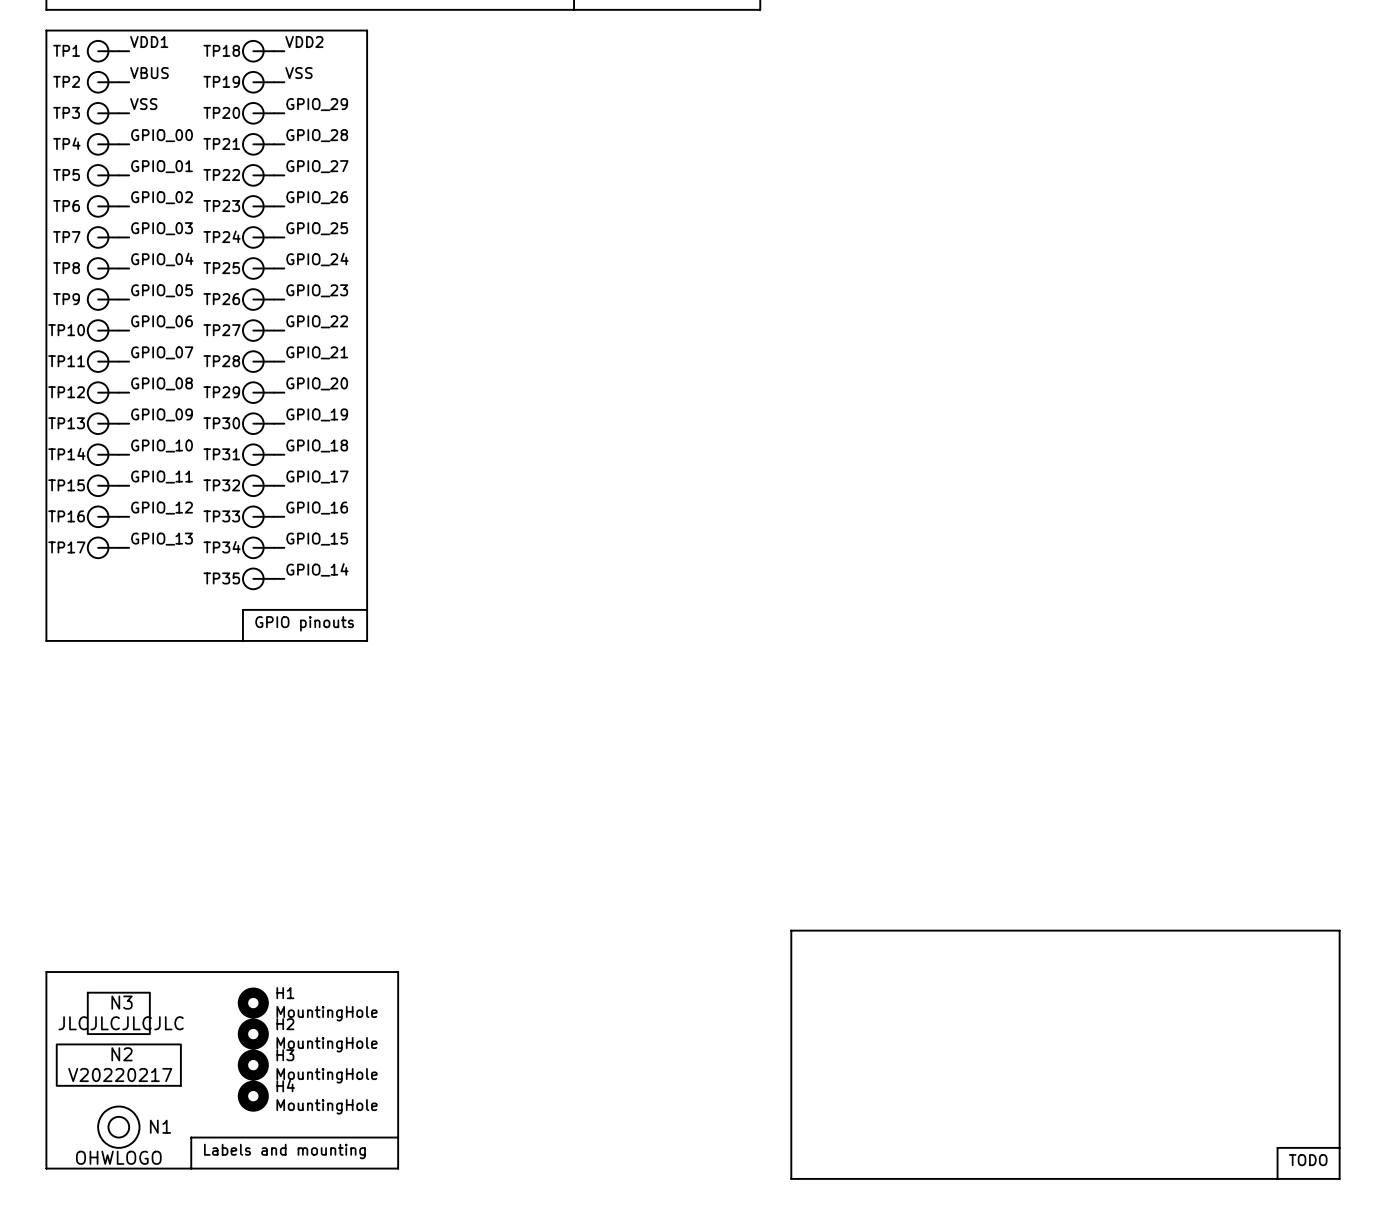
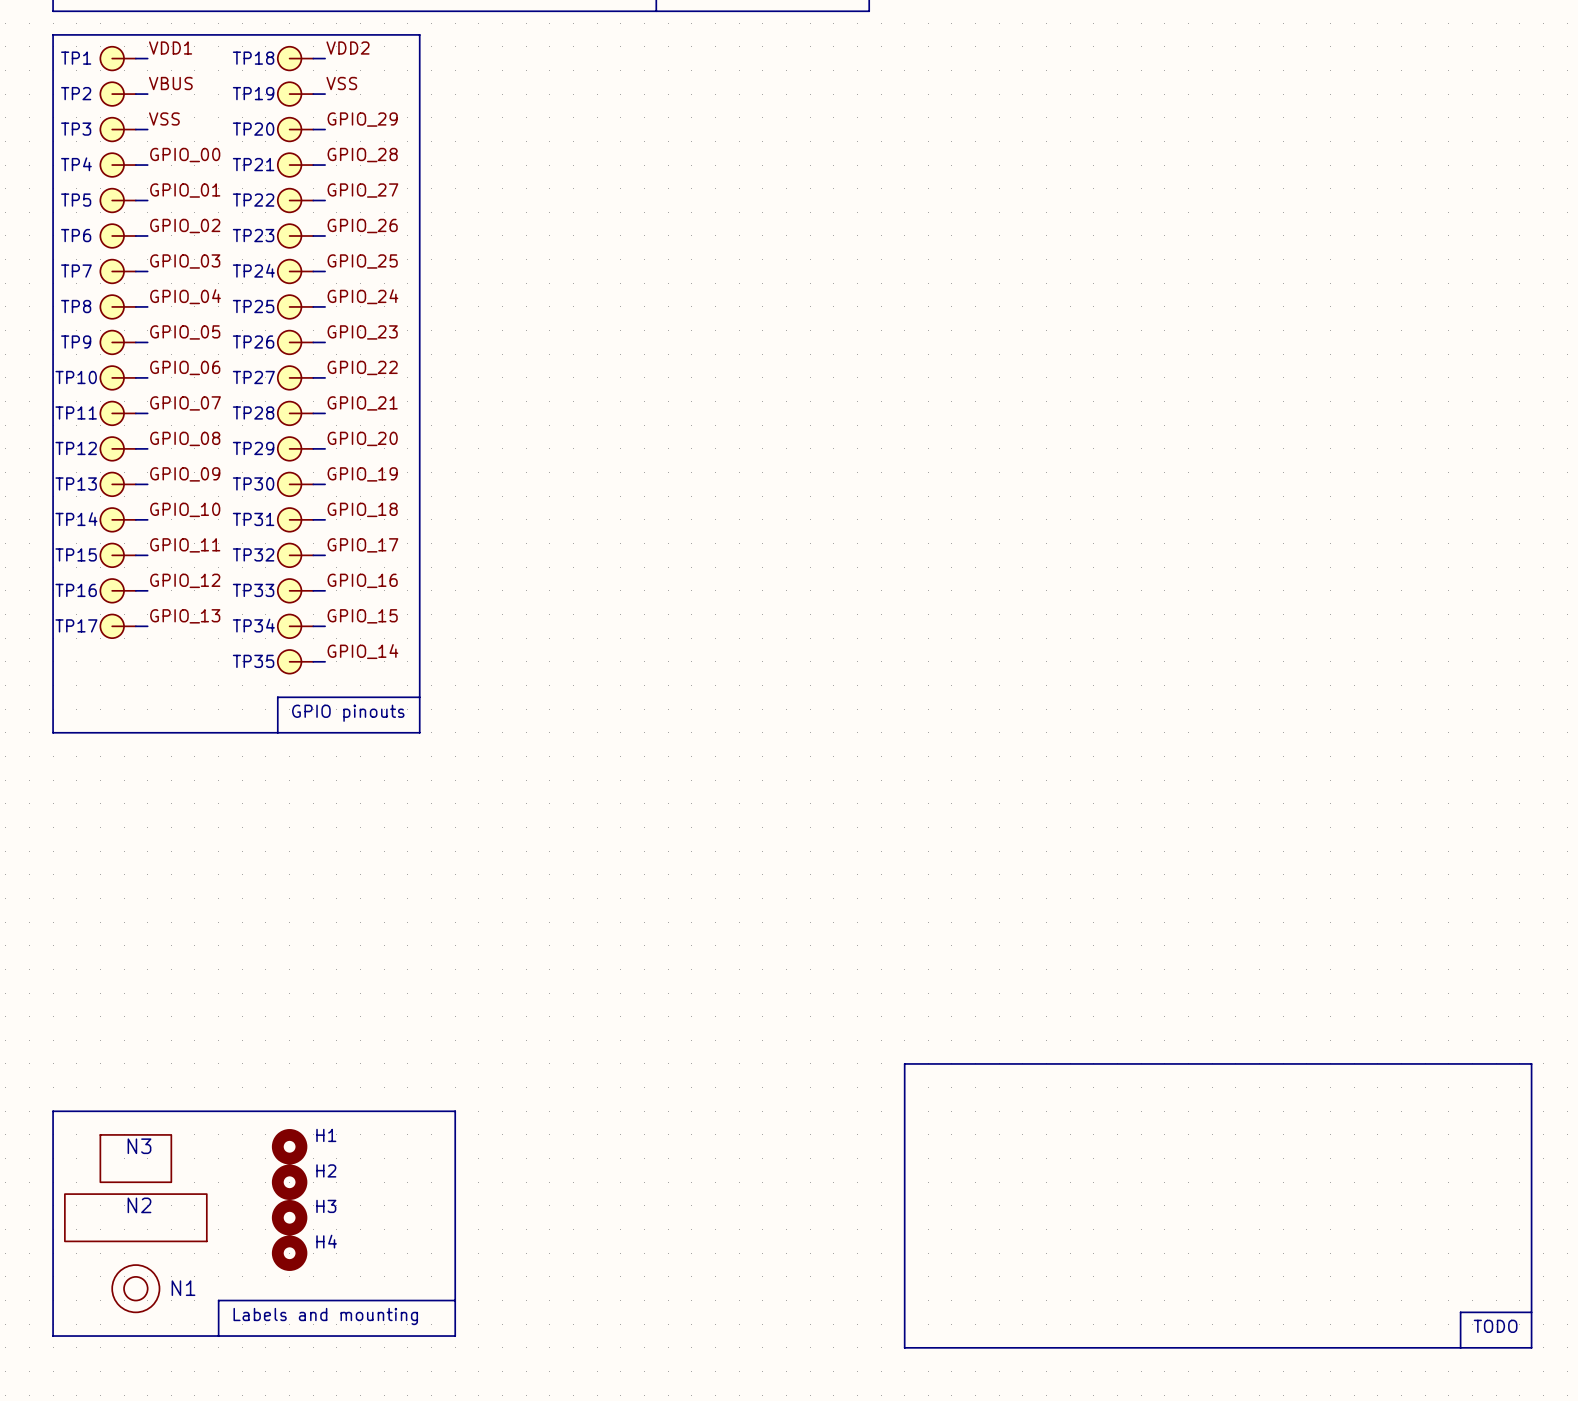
H1 value: MountingHole (327, 1013) -> none
N3 value: JLCJLCJLCJLC (121, 1023) -> none
H2 value: MountingHole (327, 1044) -> none
N2 value: V20220217 (120, 1075) -> none
H3 value: MountingHole (327, 1075) -> none
H4 value: MountingHole (327, 1106) -> none
N1 value: OHWLOGO (118, 1157) -> none

